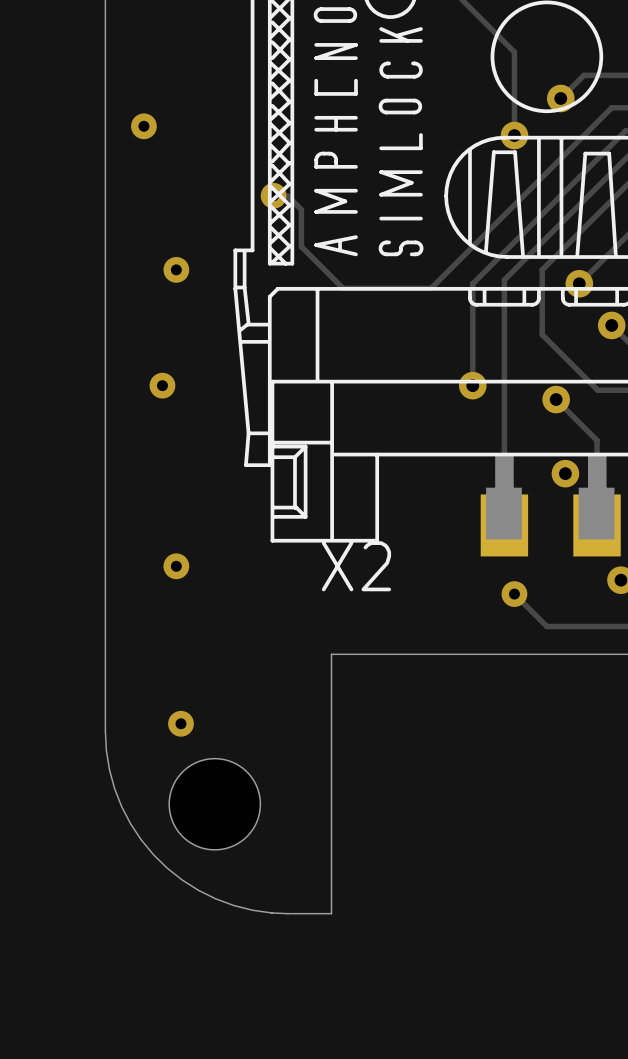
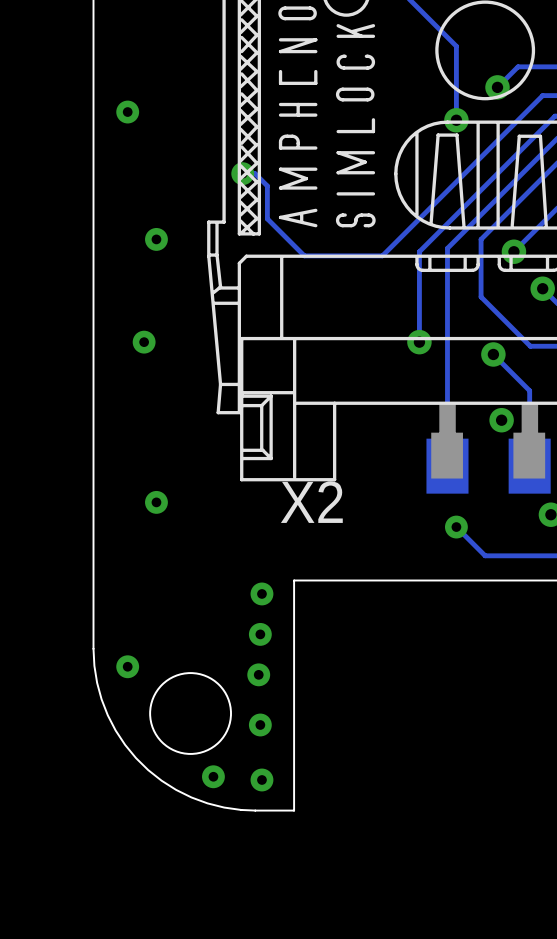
via: none -> (261, 593)
via: none -> (260, 634)
via position: (180, 723) -> (127, 666)
via: none -> (258, 674)
via: none -> (260, 724)
via: none -> (213, 776)
via: none -> (261, 779)

